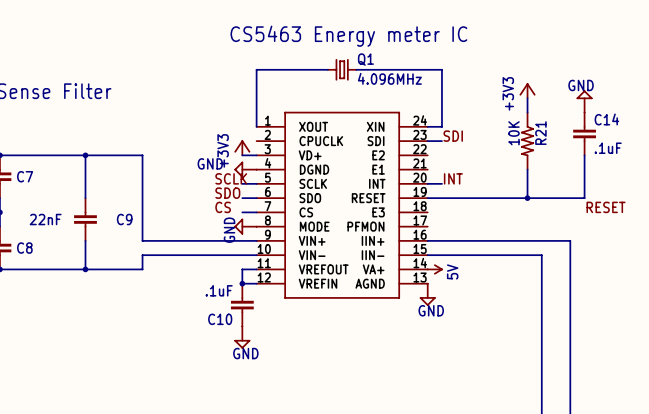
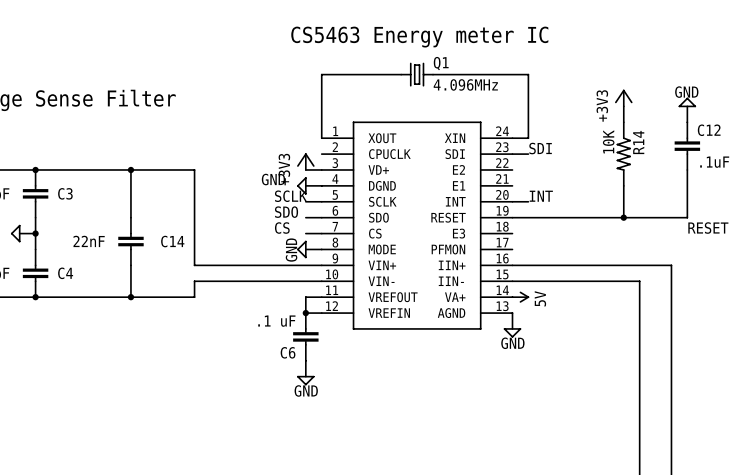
C14 name: C14 (606, 119) -> C12 (709, 130)
R21 name: R21 (540, 133) -> R14 (638, 142)
C7 name: C7 (25, 176) -> C3 (65, 193)
C9 name: C9 (124, 219) -> C14 (172, 241)
C8 name: C8 (24, 248) -> C4 (65, 273)
C10 value: .1uF (219, 290) -> .1 uF (276, 321)
C10 name: C10 (220, 319) -> C6 (288, 352)

